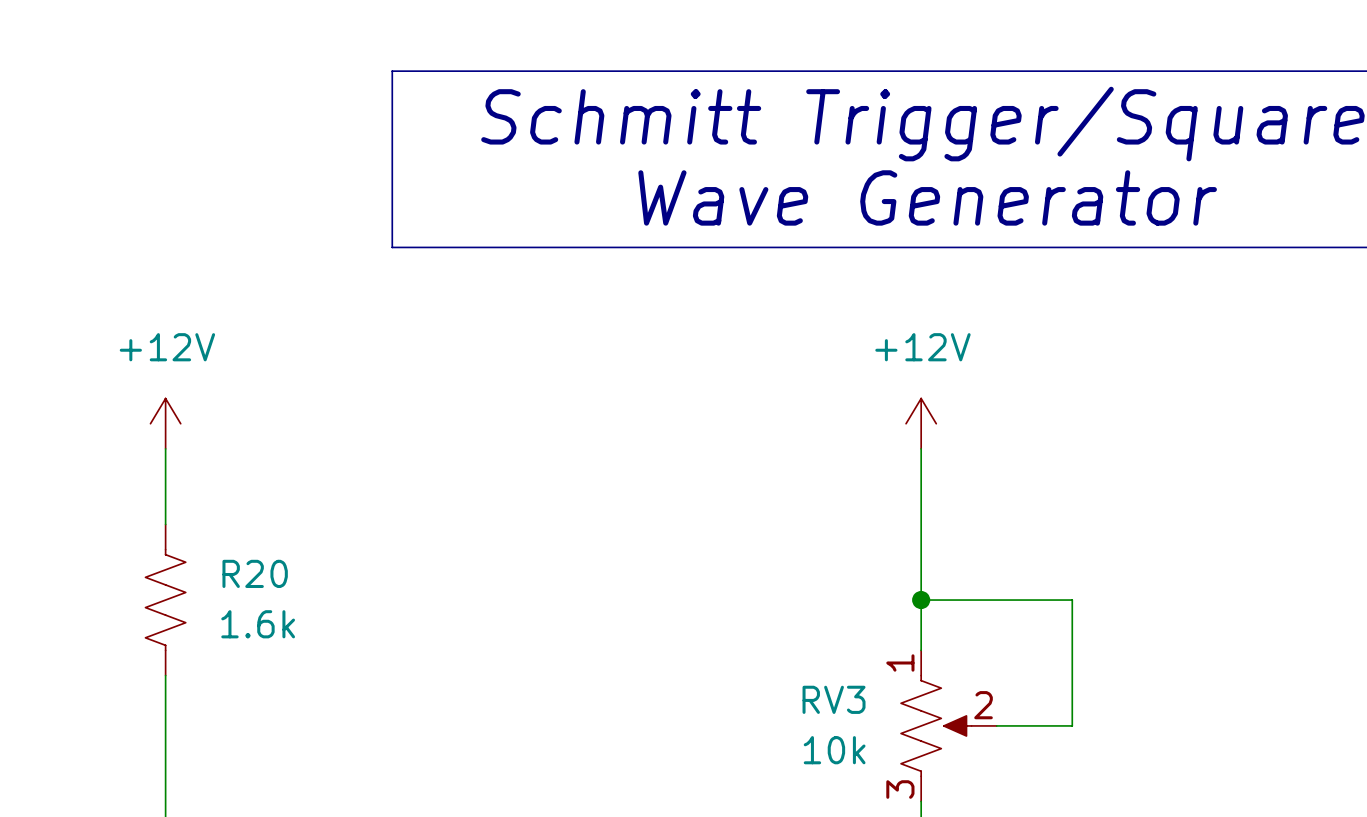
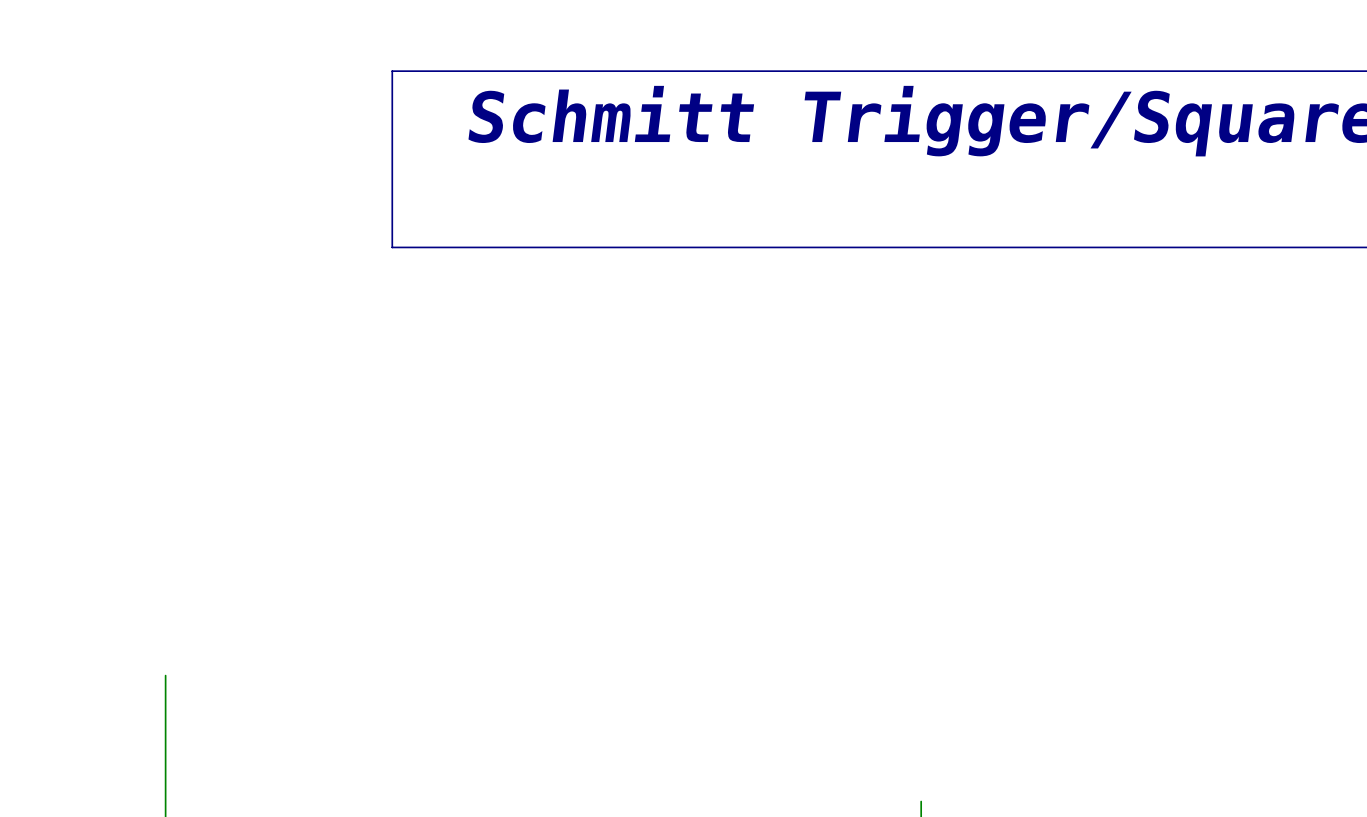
text: Wave Generator (927, 197) -> none
power symbol: +12V (165, 423) -> none
power symbol: +12V (921, 423) -> none
wire: (165, 448) (165, 524) -> none
wire: (921, 448) (921, 650) -> none
R20: 1.6k (165, 600) -> none
wire: (921, 600) (1072, 600) (1072, 725) (996, 725) -> none
junction: (921, 600) -> none
RV3: 10k (948, 725) -> none

